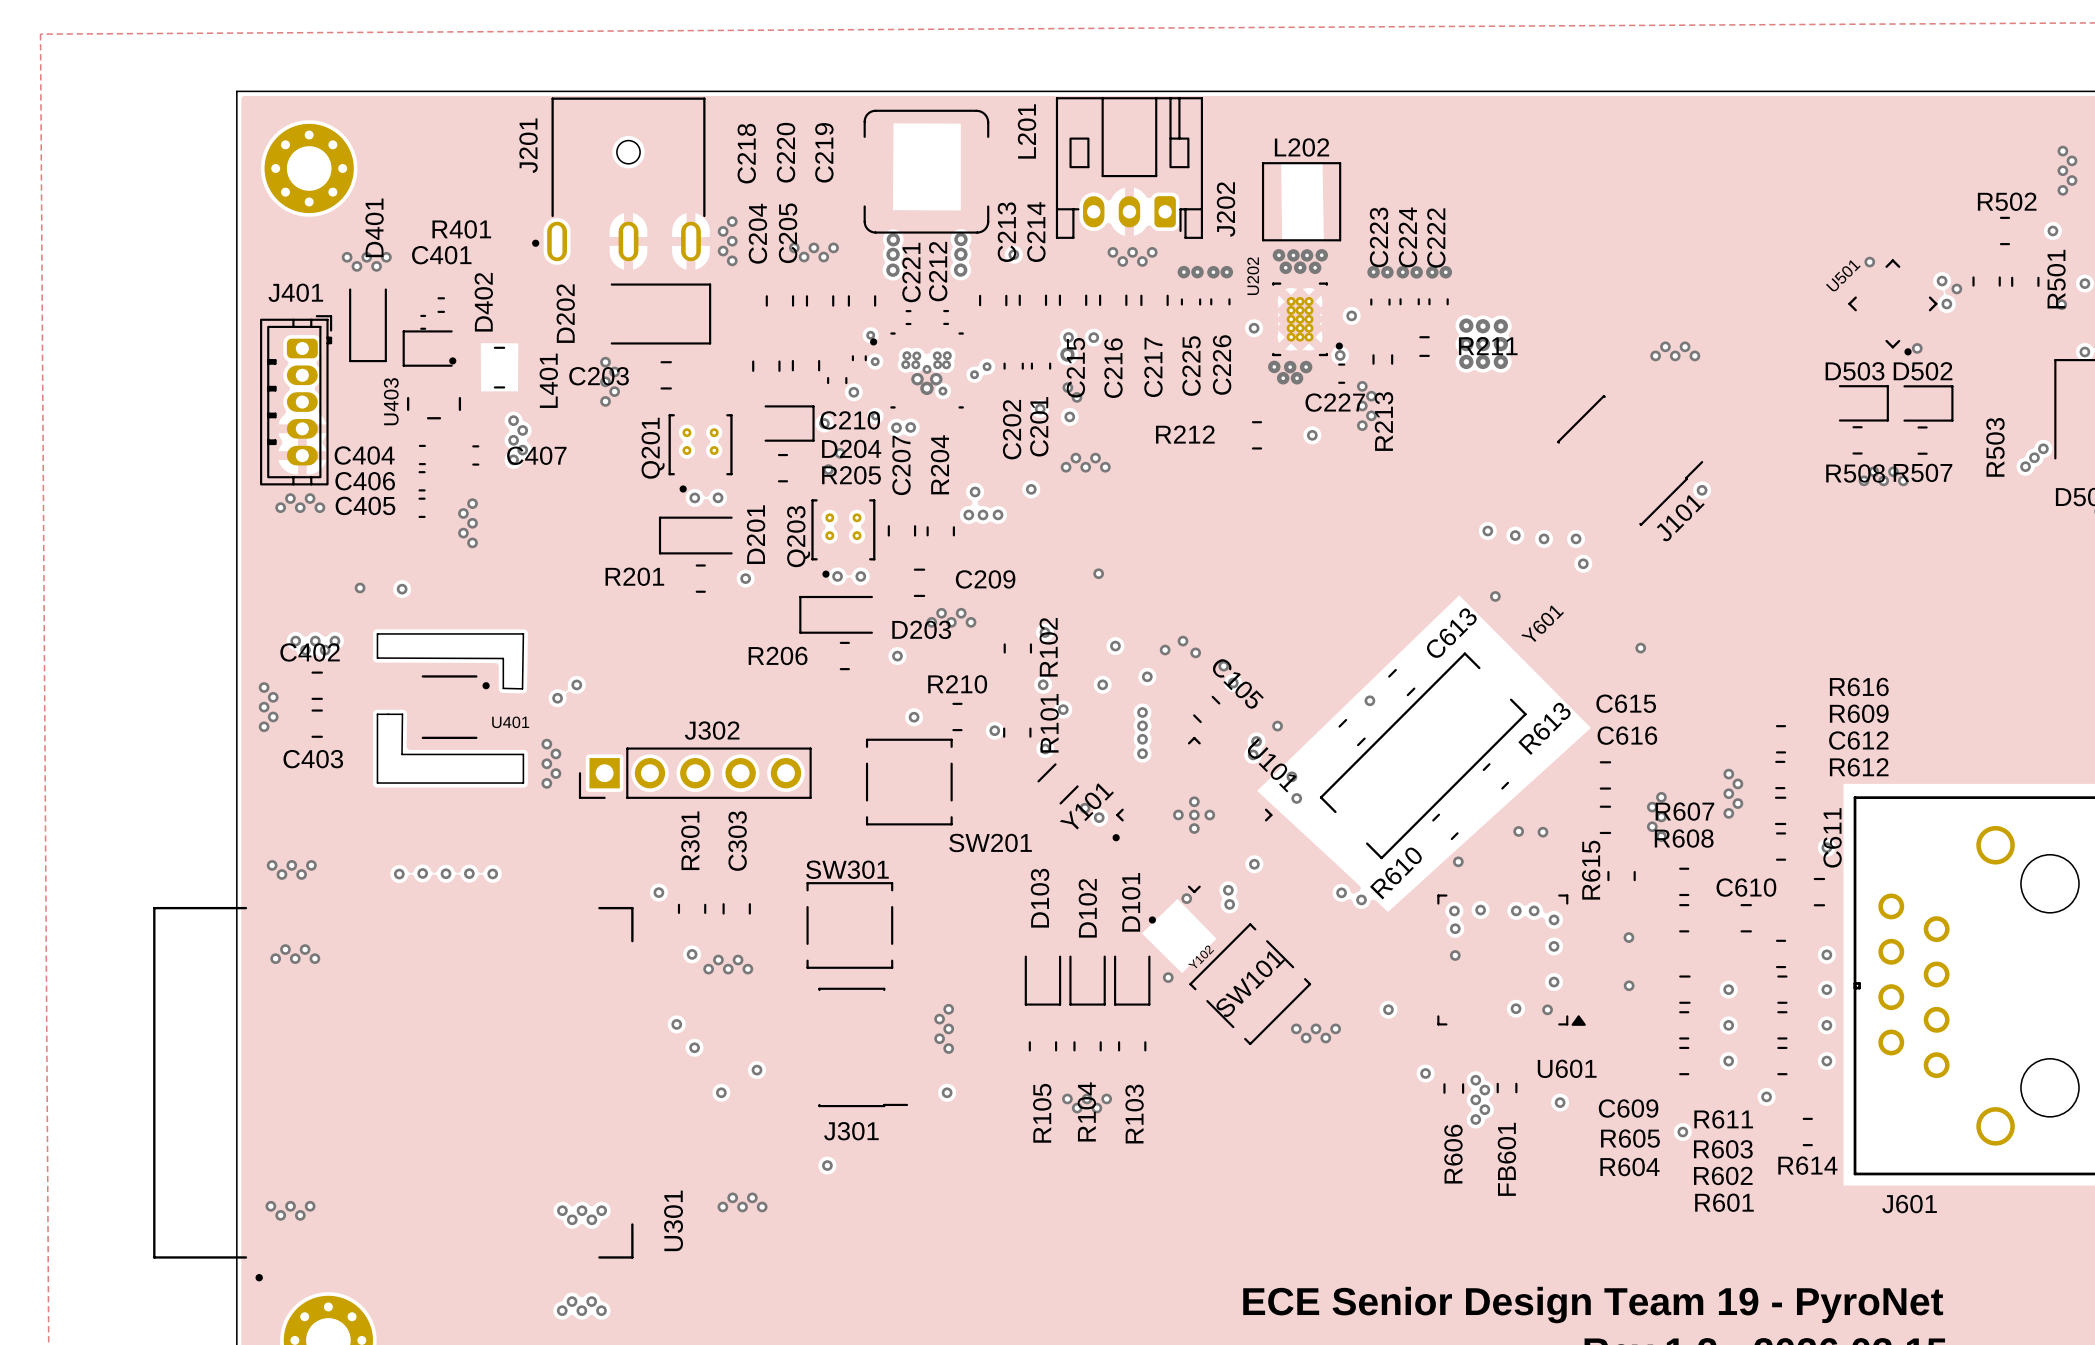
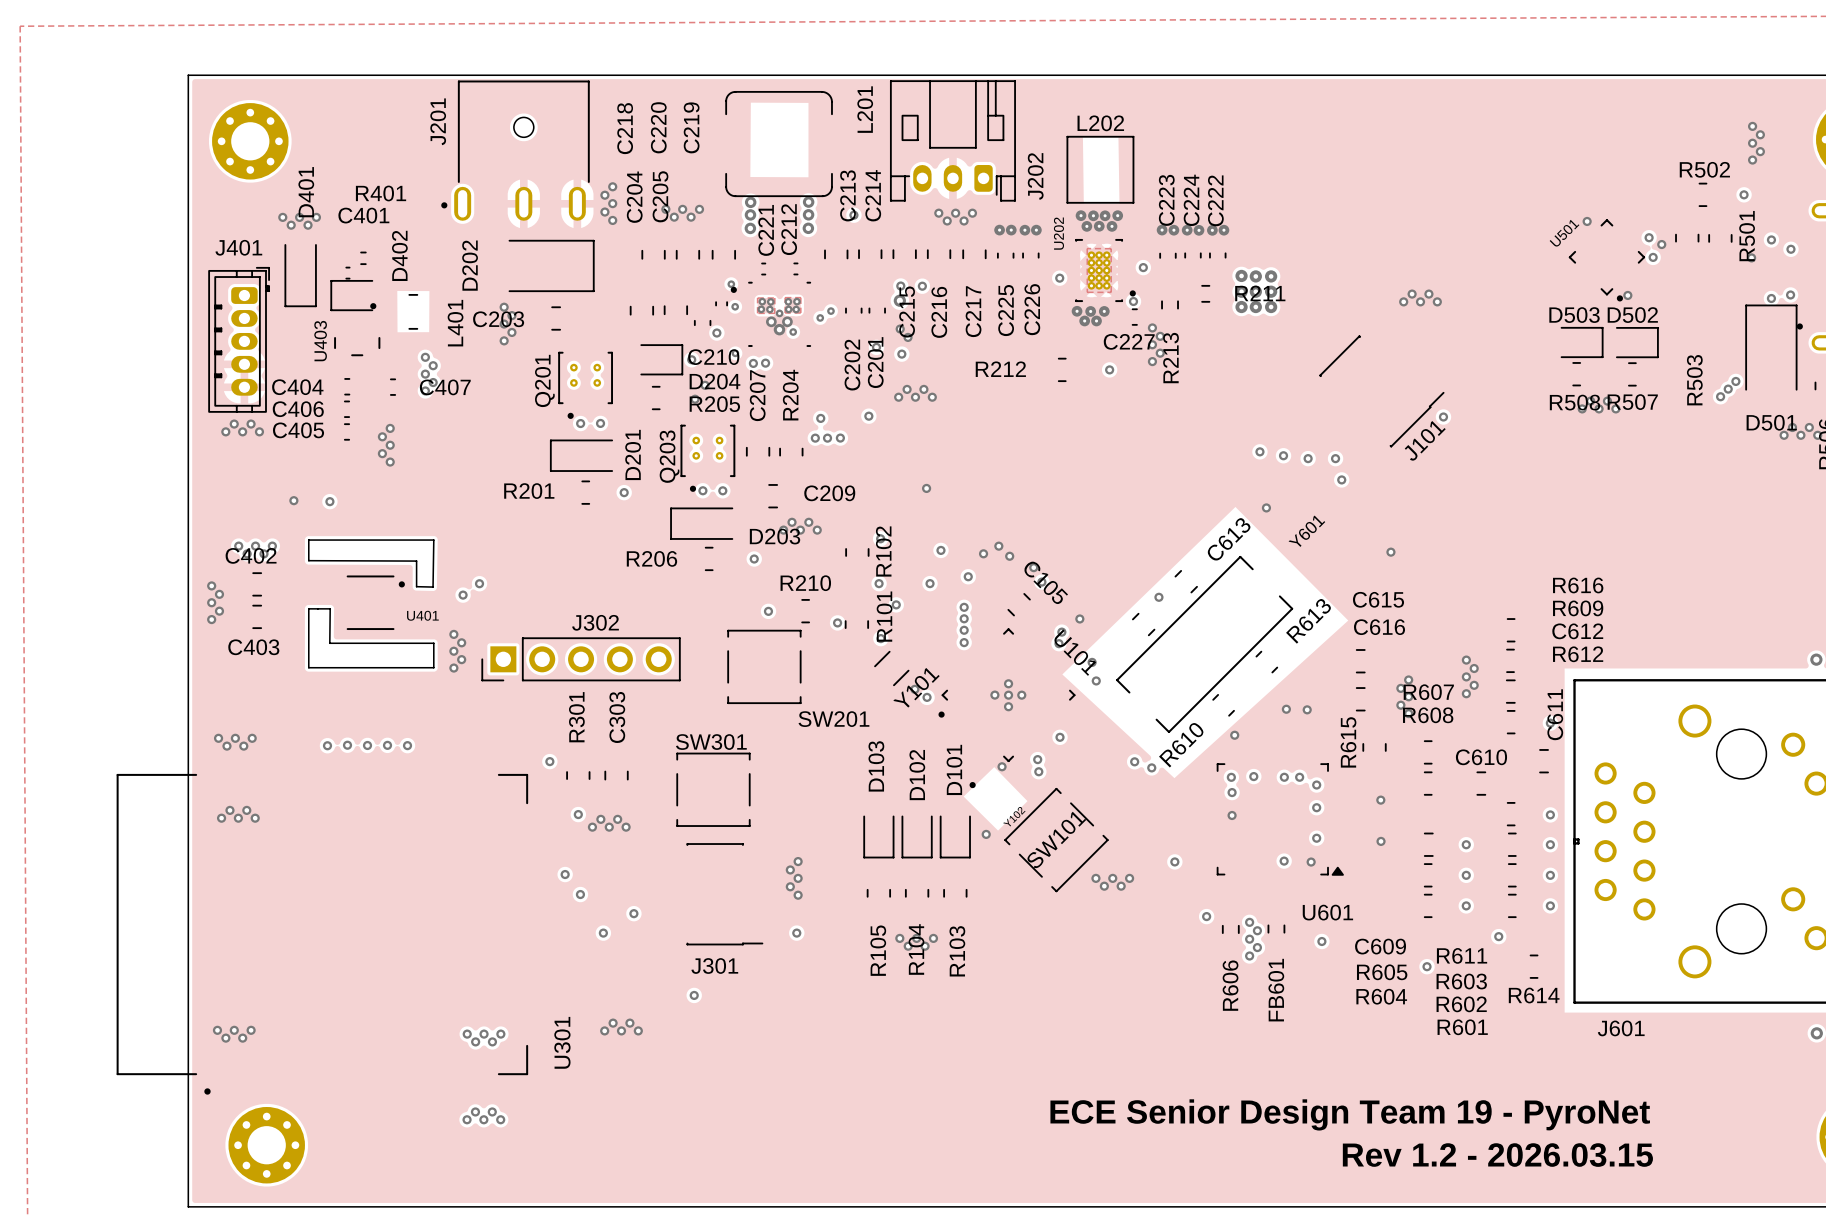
zone outline: none -> (1087, 248) (1087, 292) (1111, 292) (1111, 248) (1087, 248)
zone outline: none -> (757, 298) (757, 313) (774, 313) (774, 298) (757, 298)
zone outline: none -> (785, 297) (785, 312) (800, 312) (800, 297) (785, 297)

